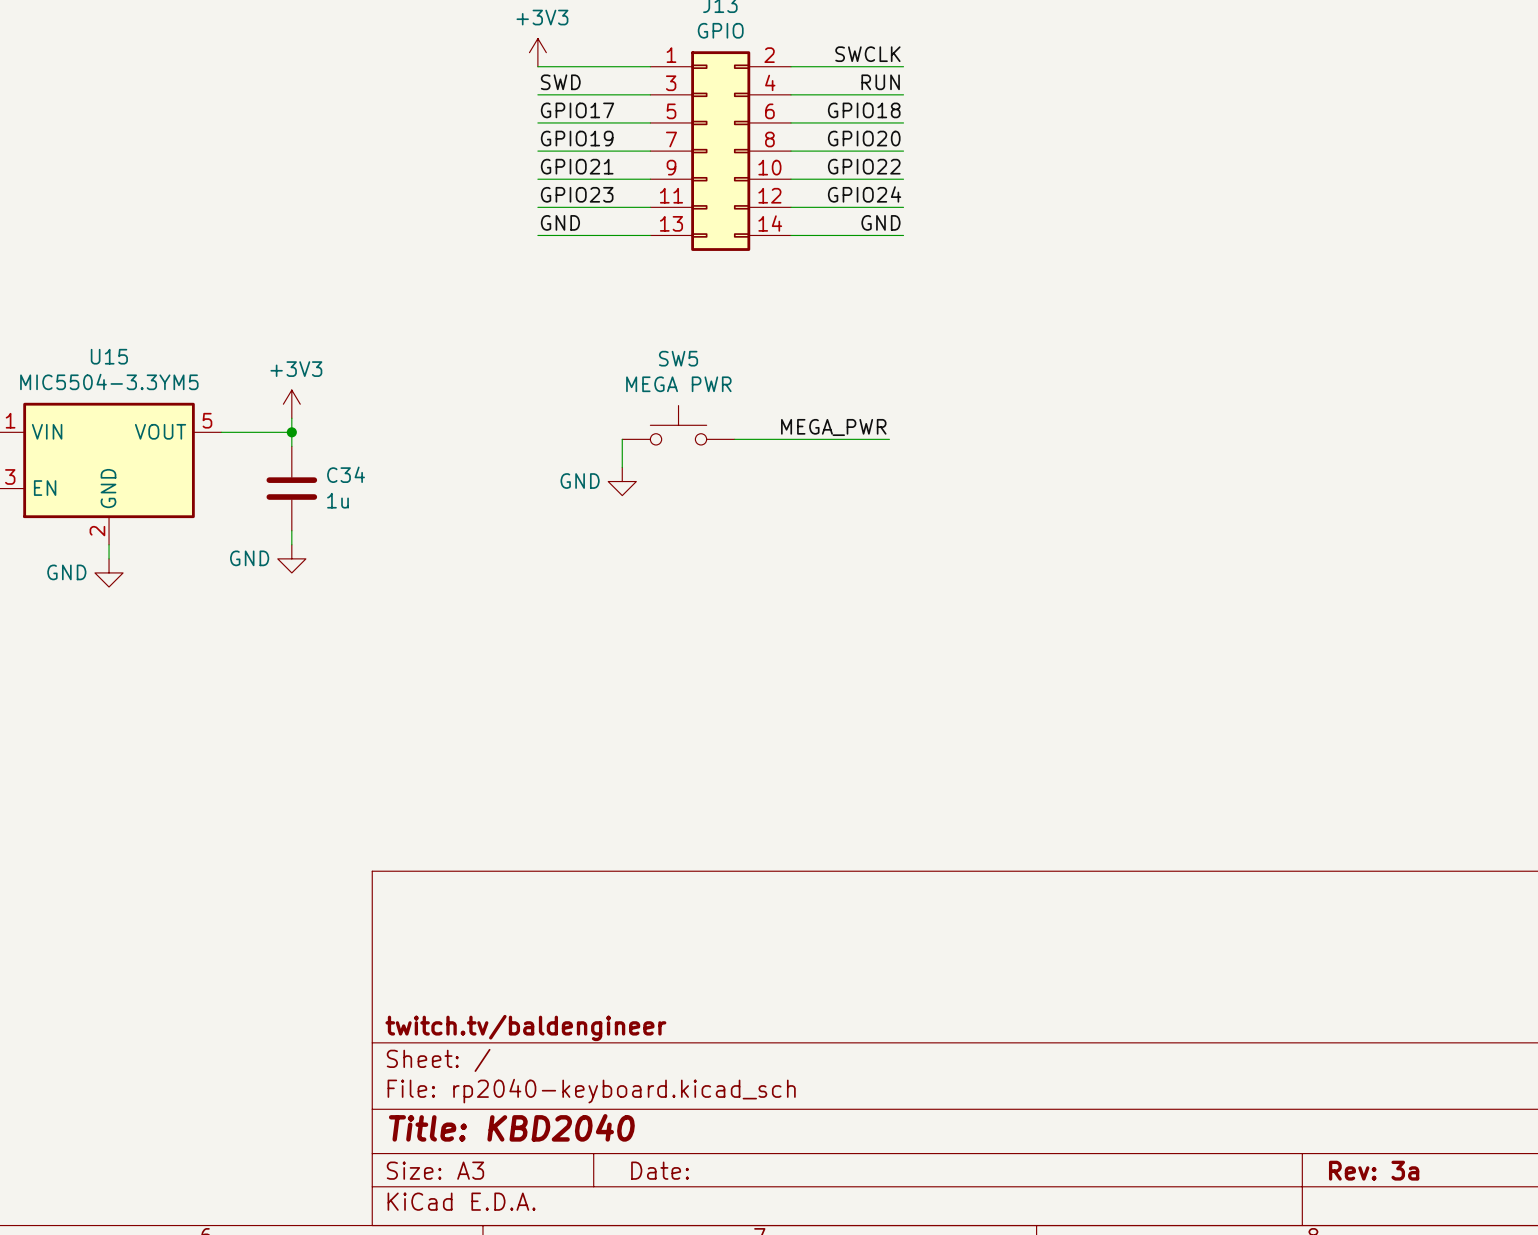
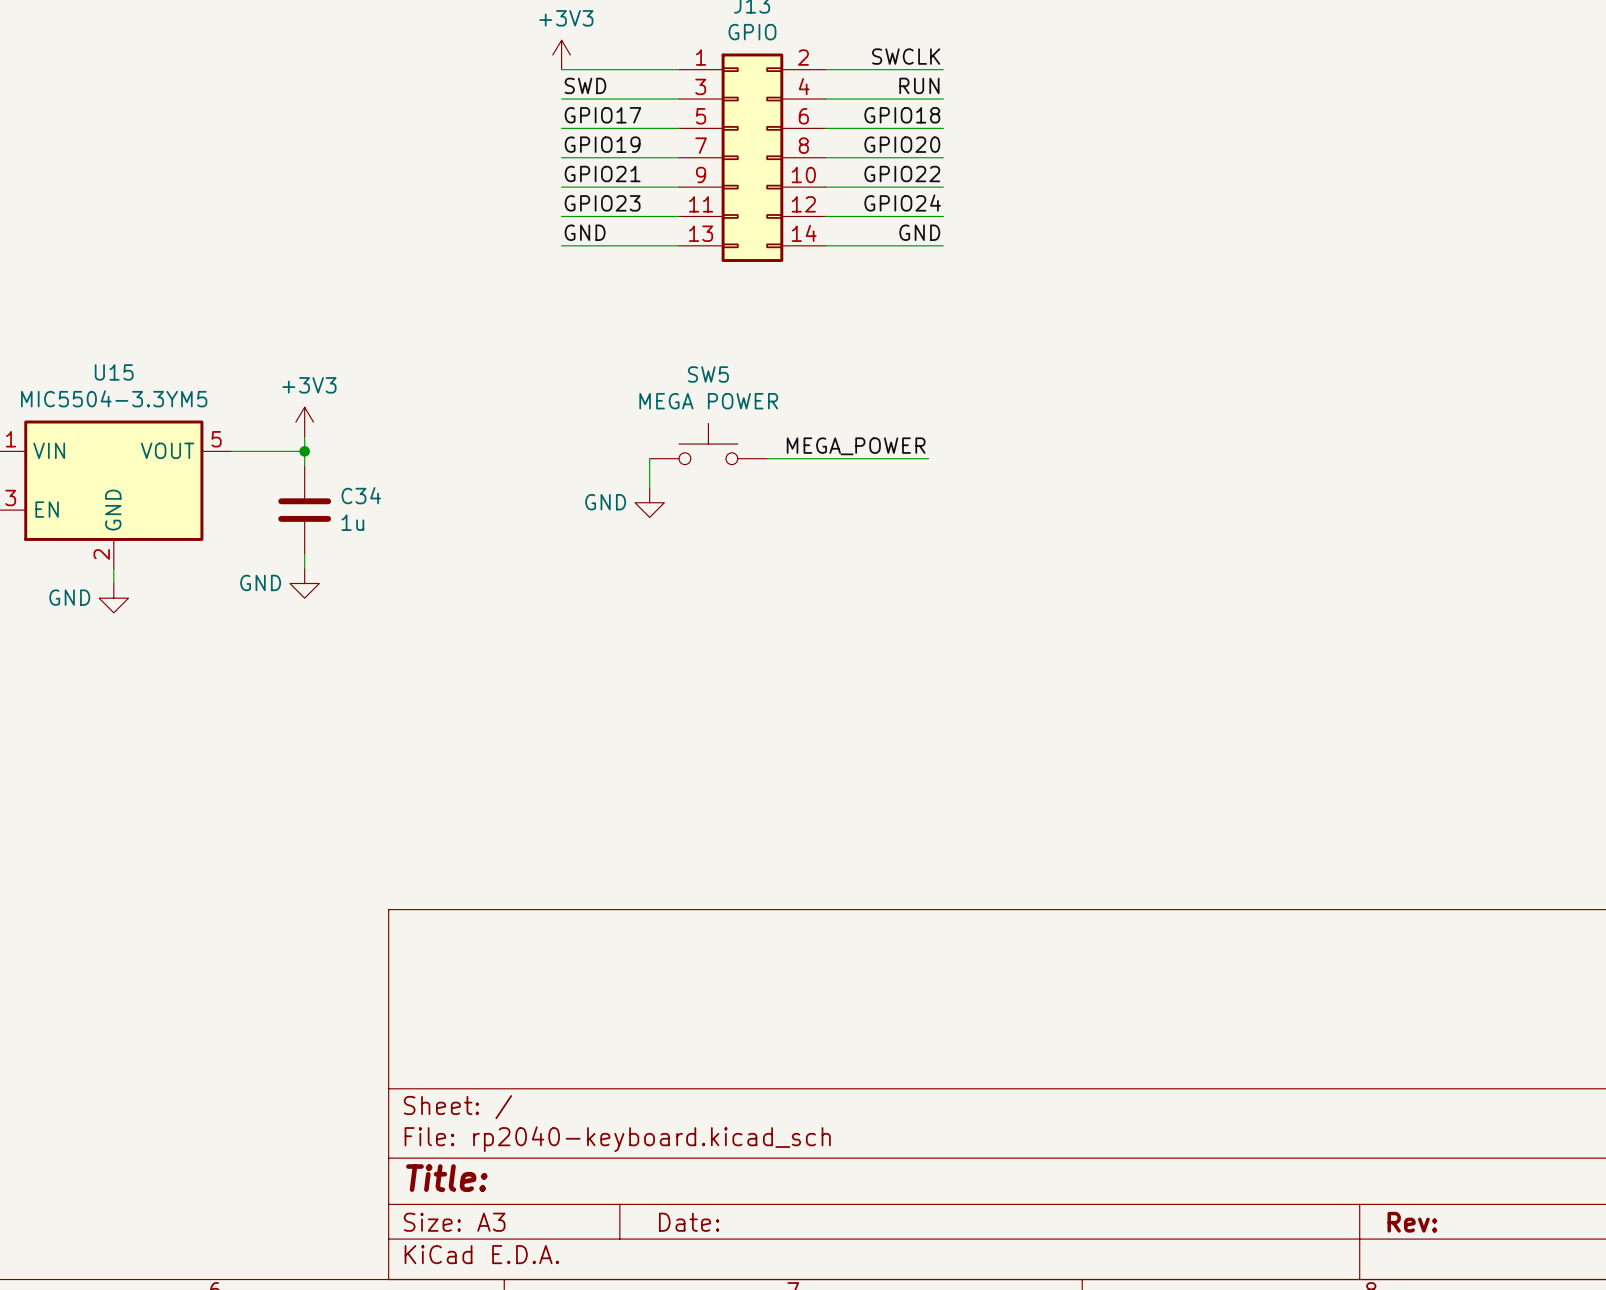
SW5 value: MEGA PWR (678, 384) -> MEGA POWER (708, 401)
label: MEGA_PWR (833, 427) -> MEGA_POWER (856, 446)
title block: twitch.tv/baldengineer (525, 1027) -> none
title block: Title: KBD2040 (511, 1127) -> Title: (446, 1178)
title block: Rev: 3a (1374, 1170) -> Rev: (1412, 1222)

